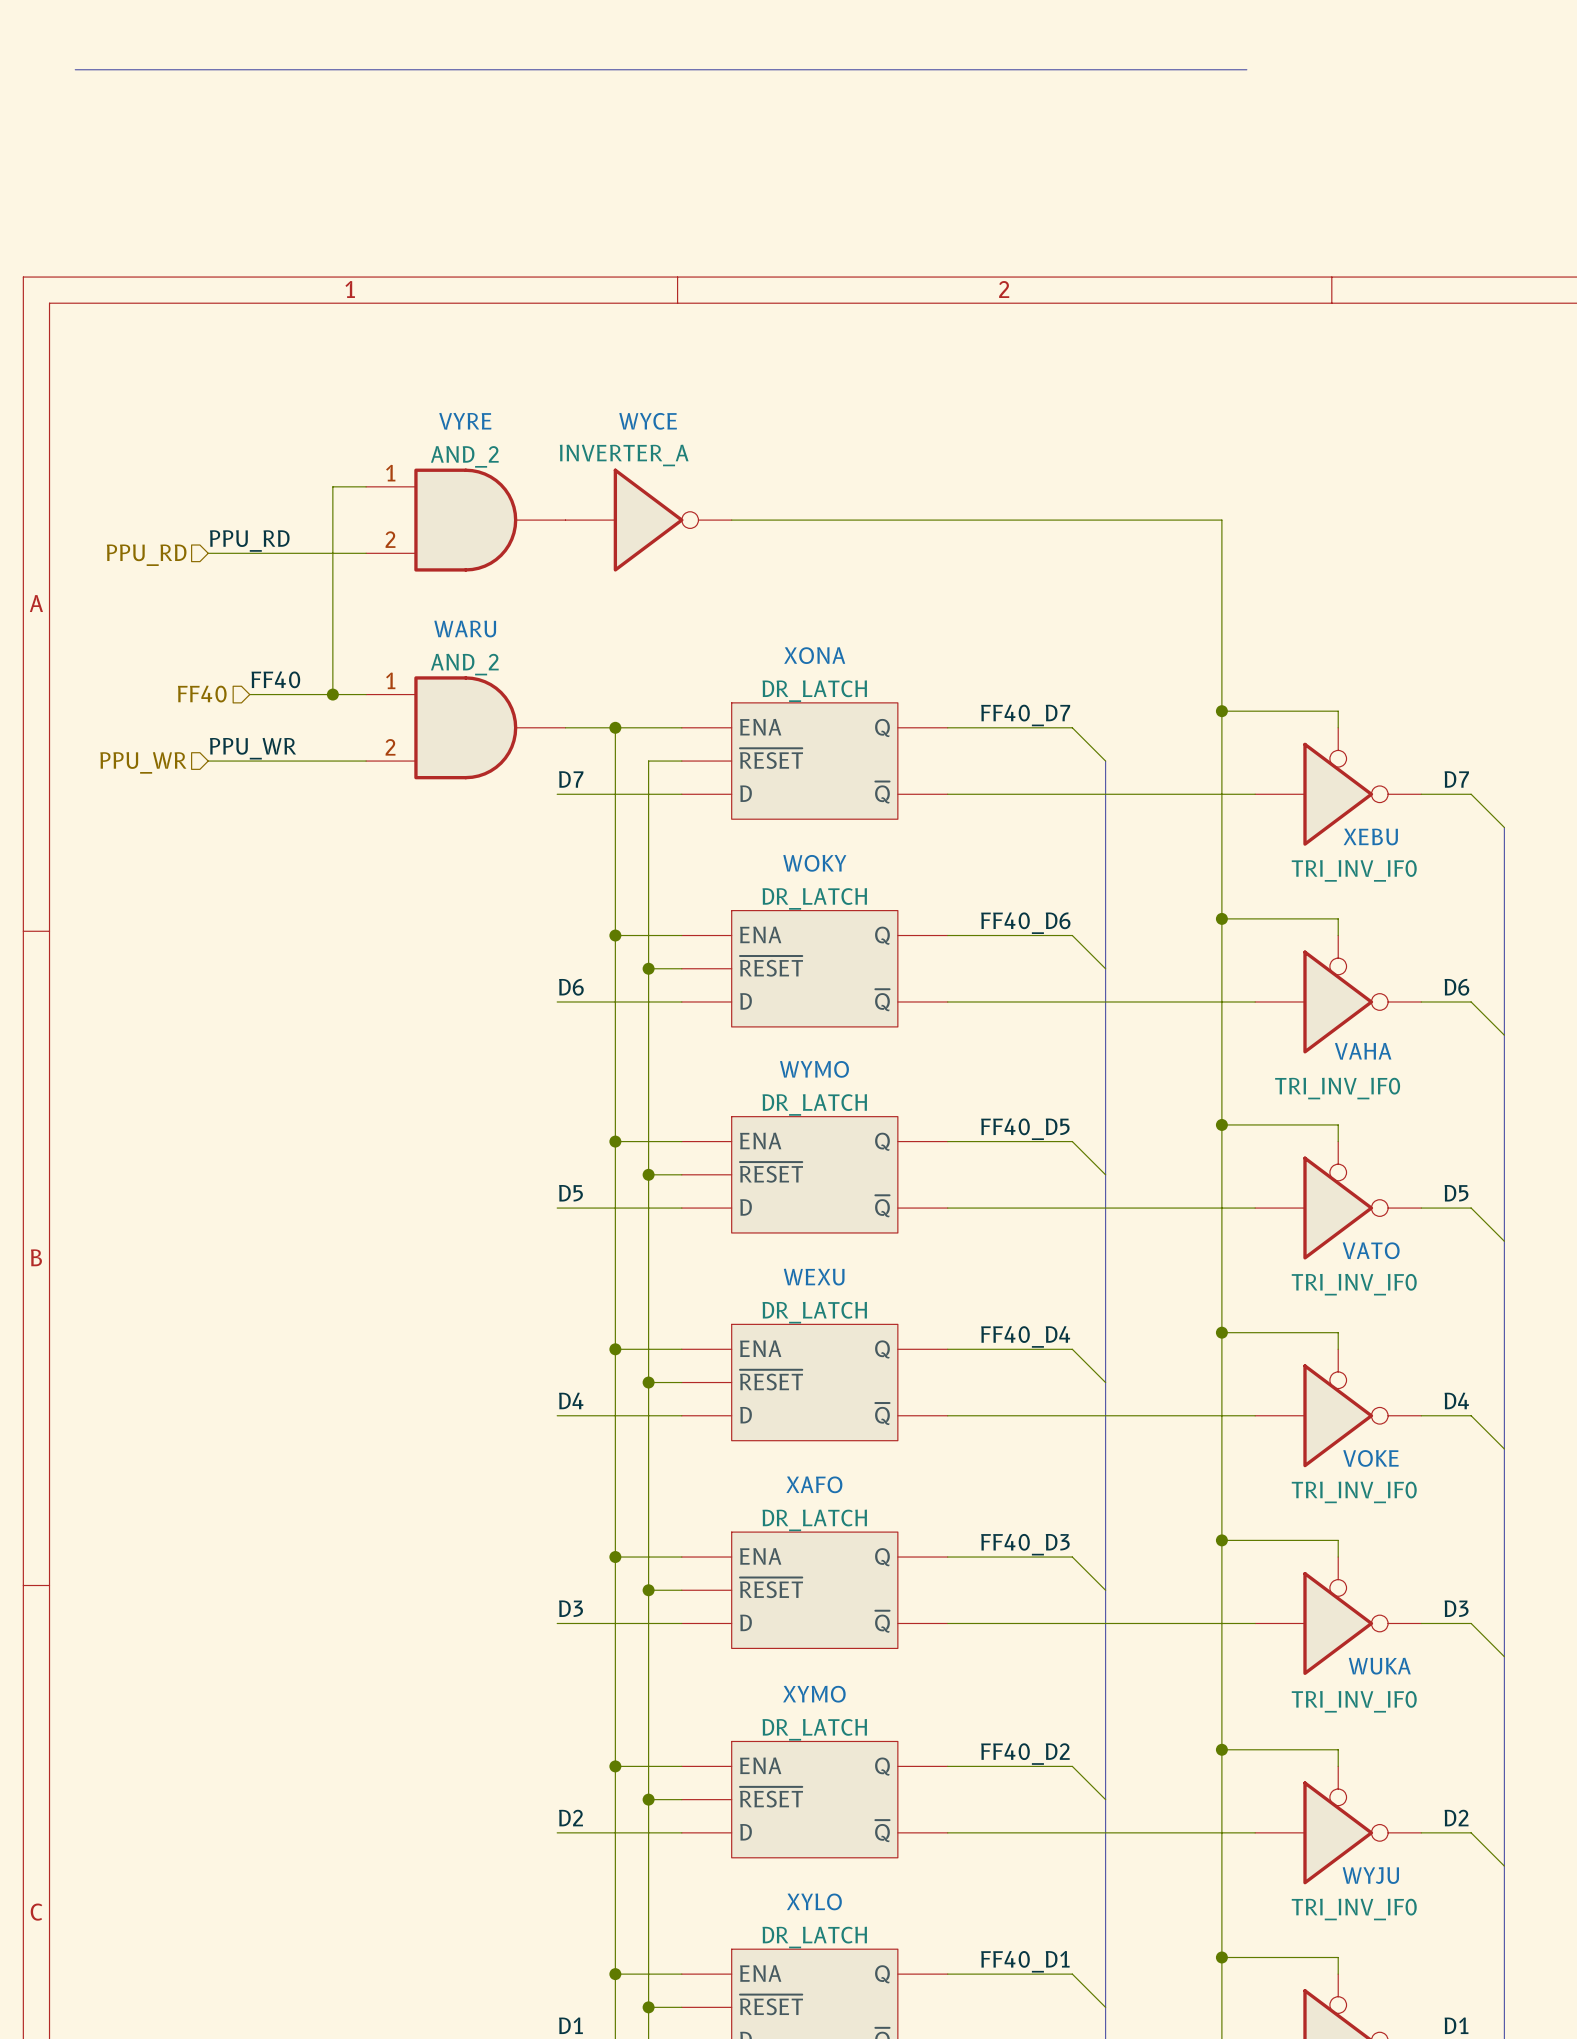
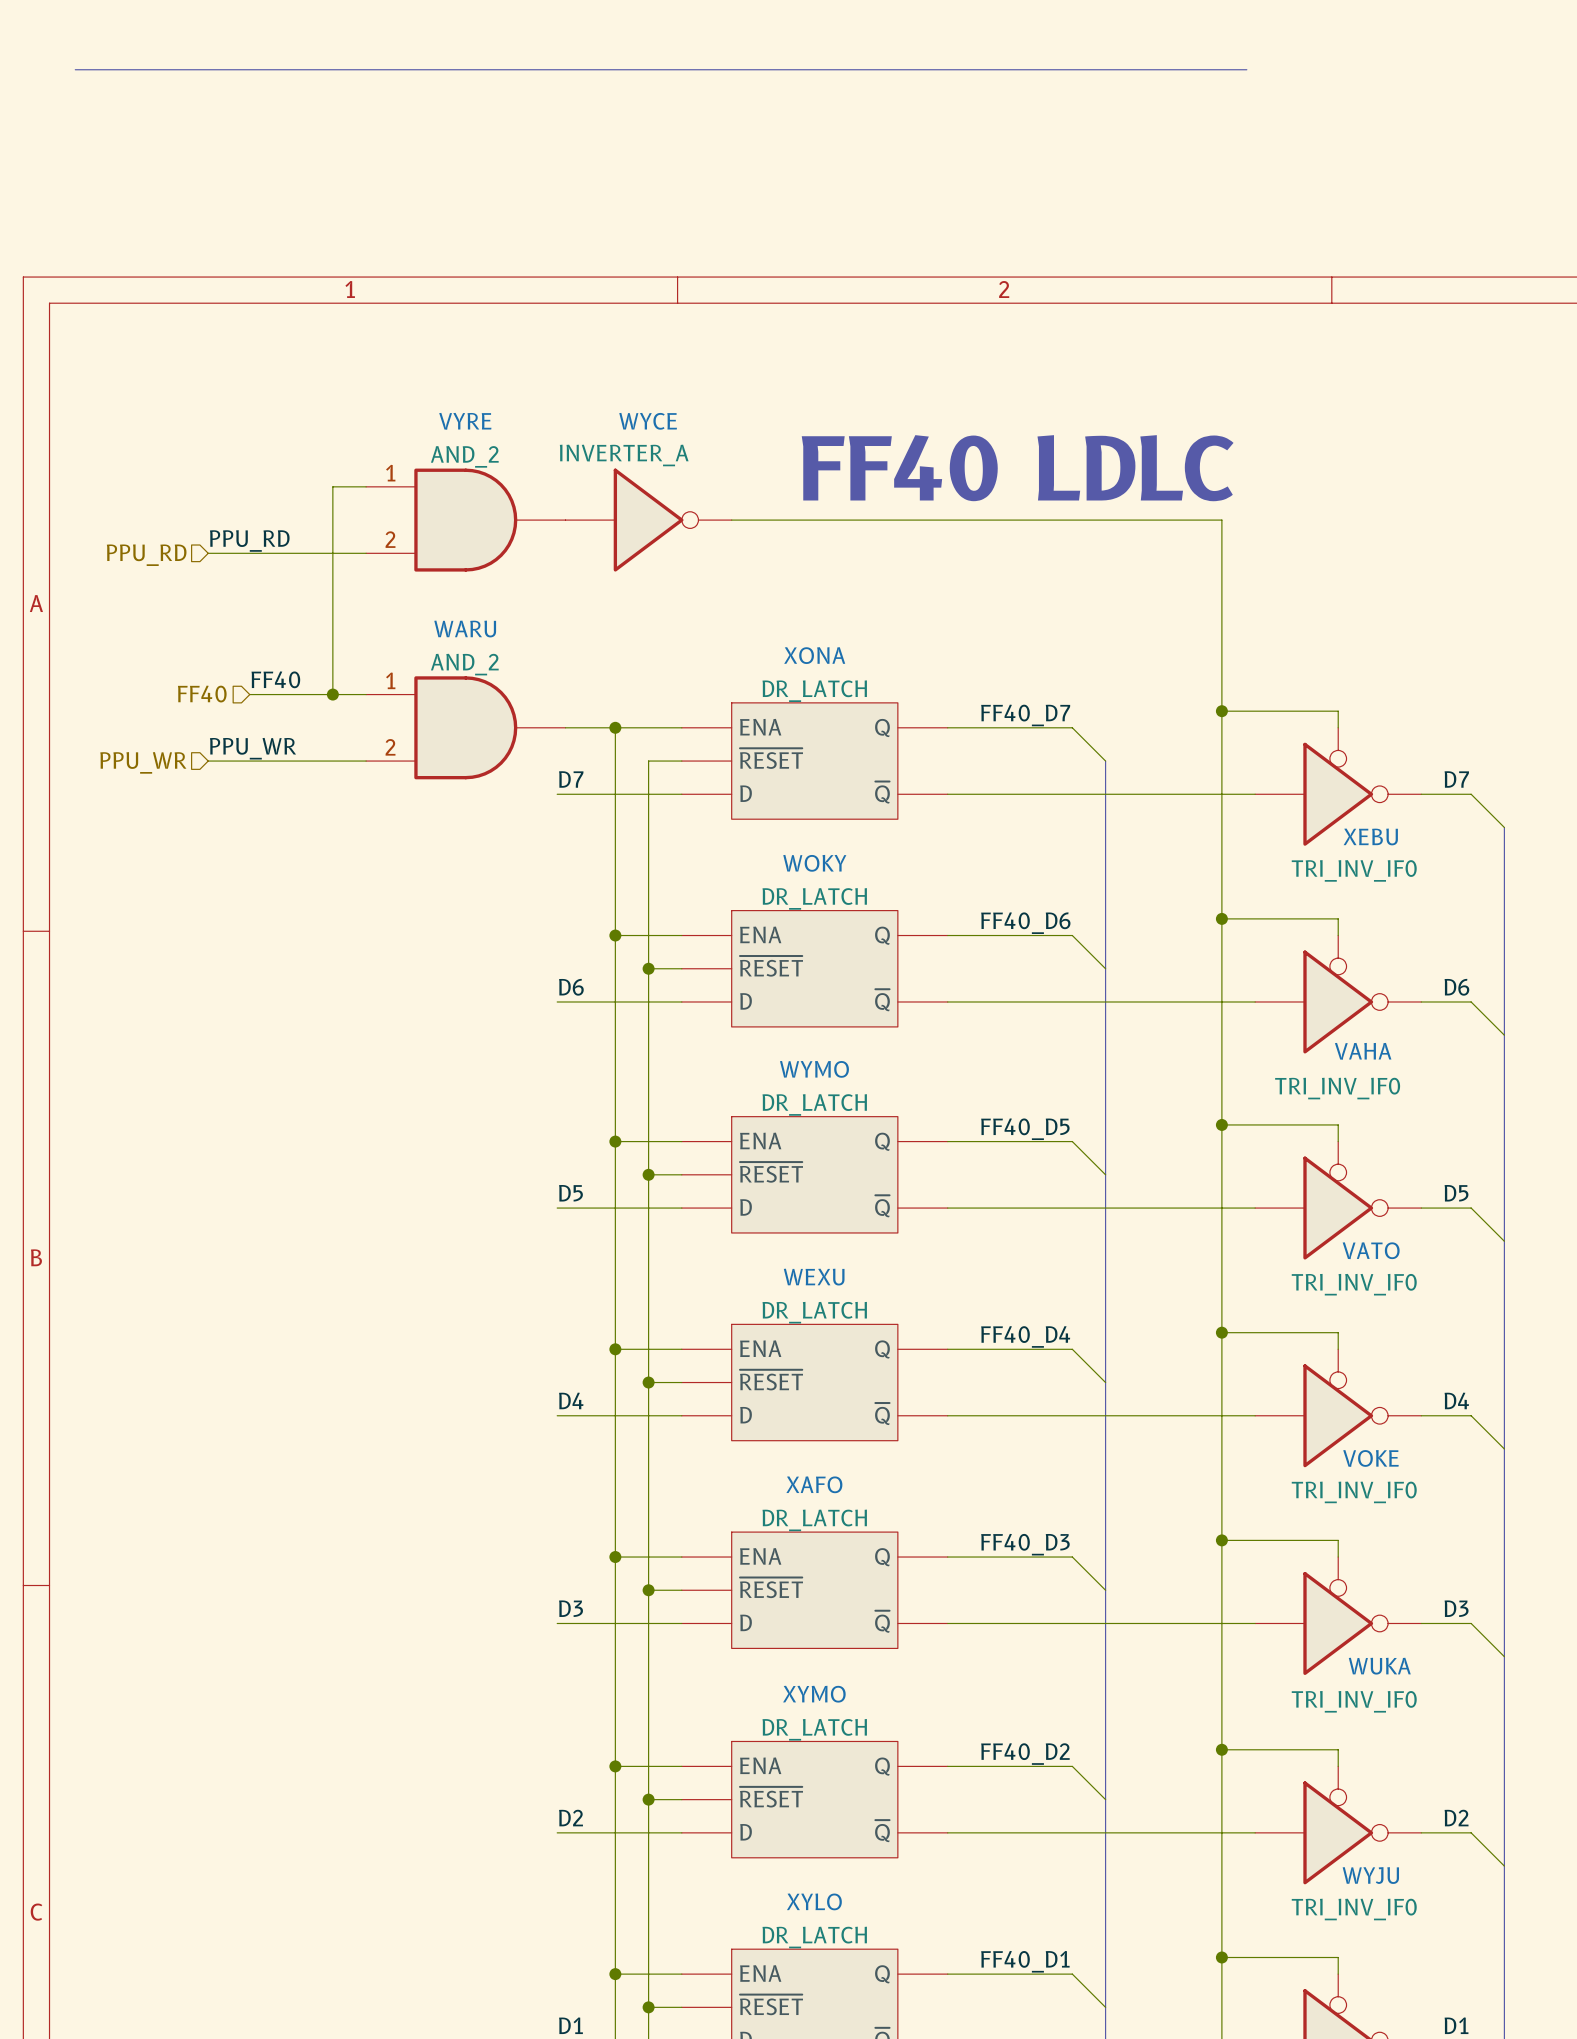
text: none -> FF40 LDLC (1017, 468)

